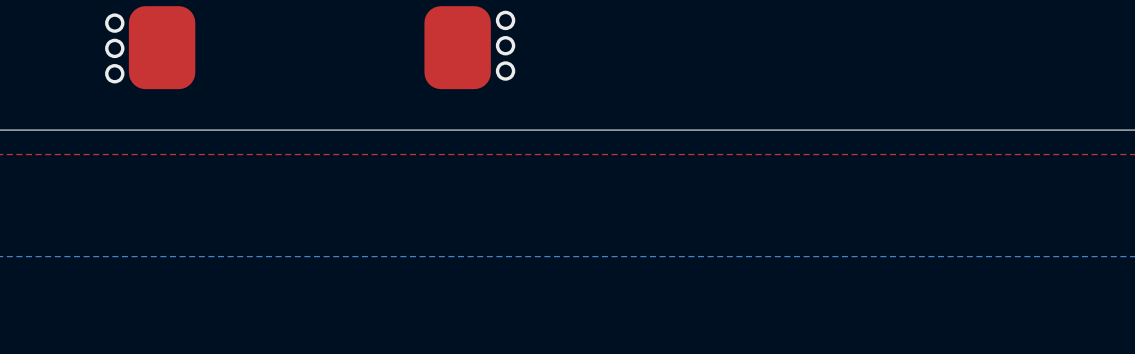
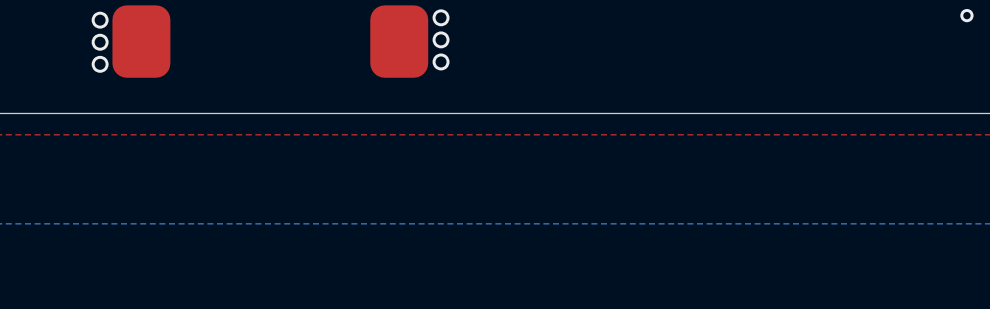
via: none -> (966, 15)

